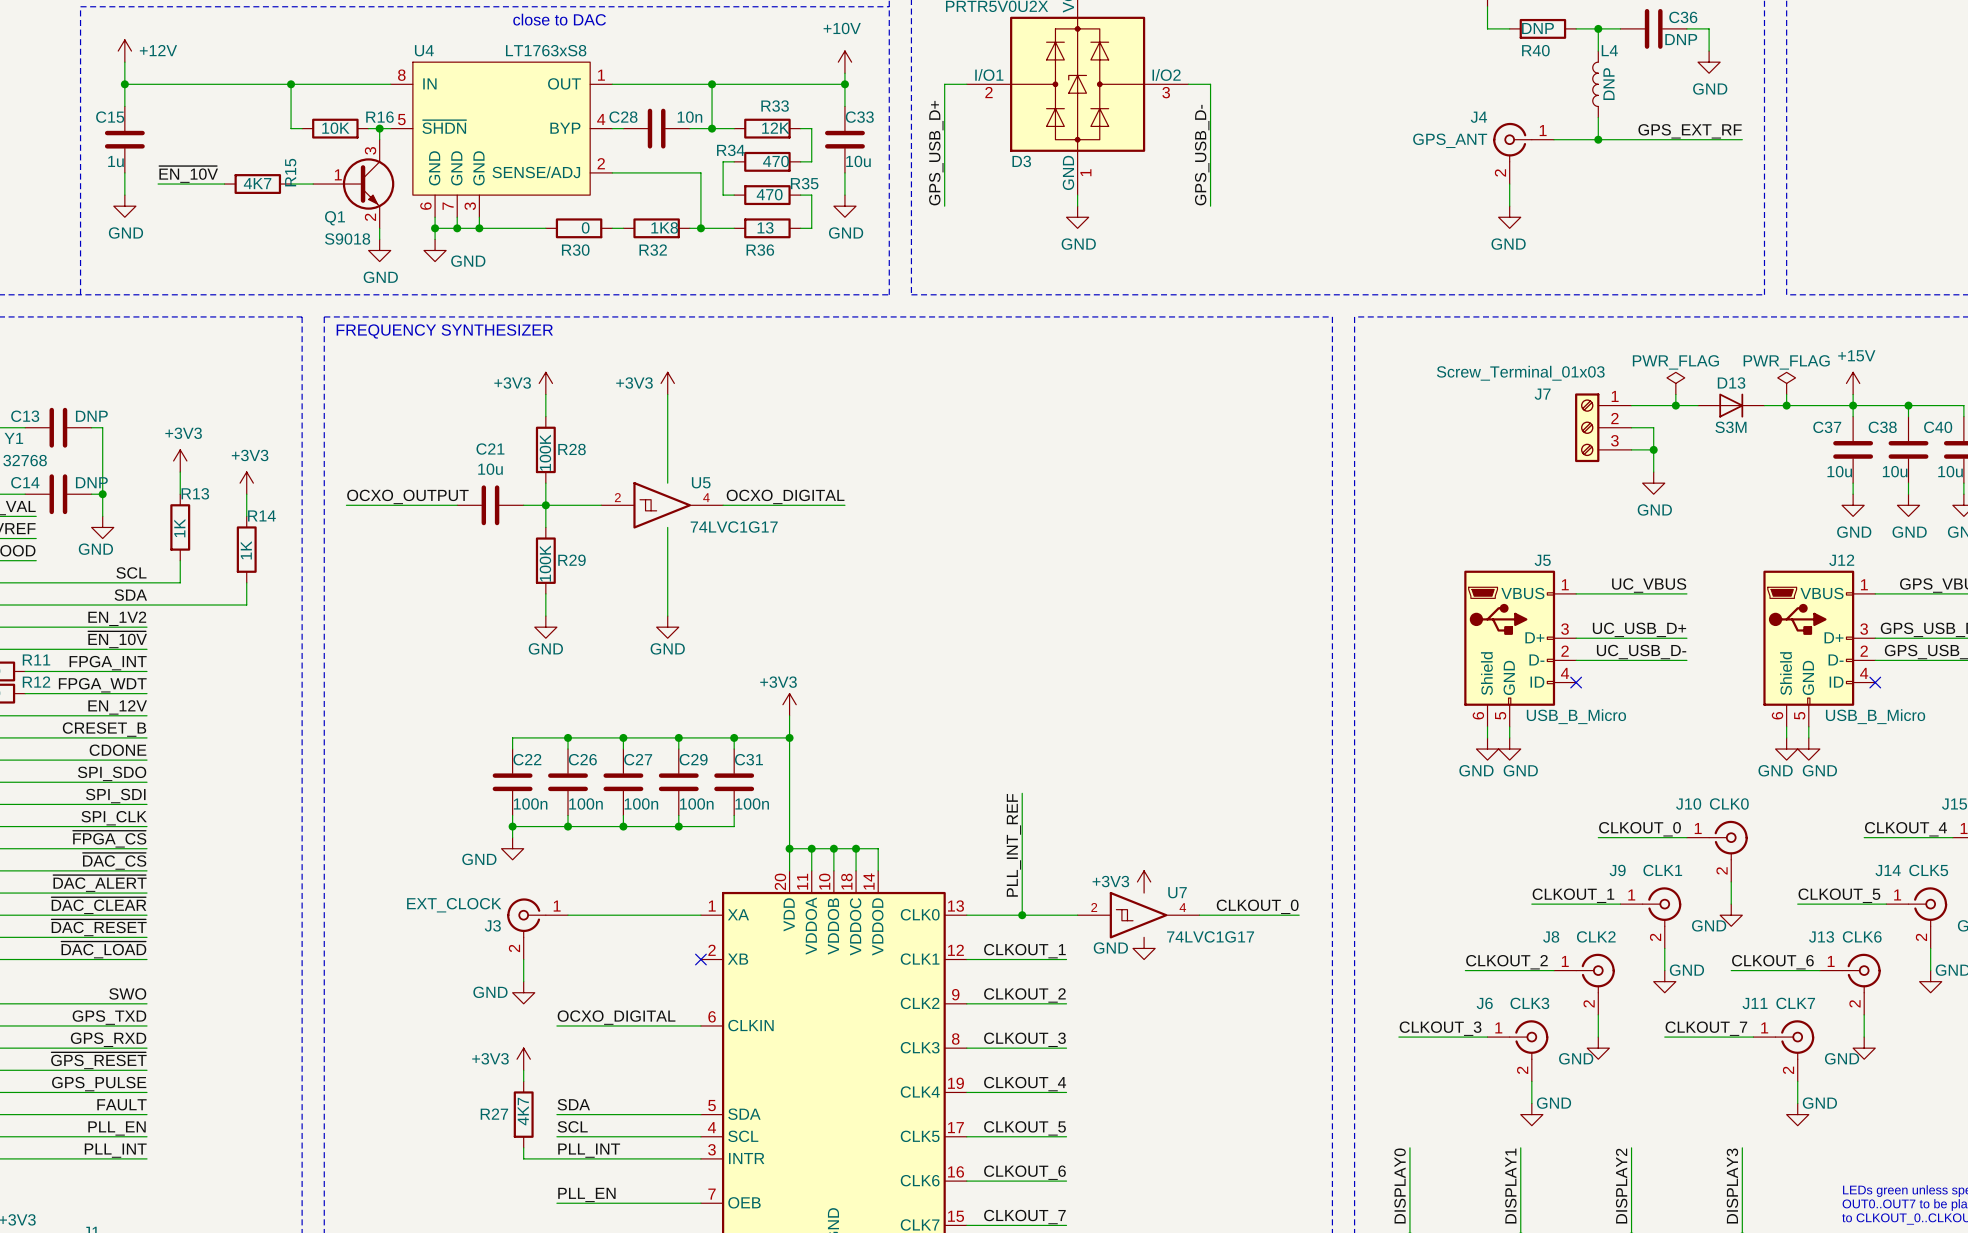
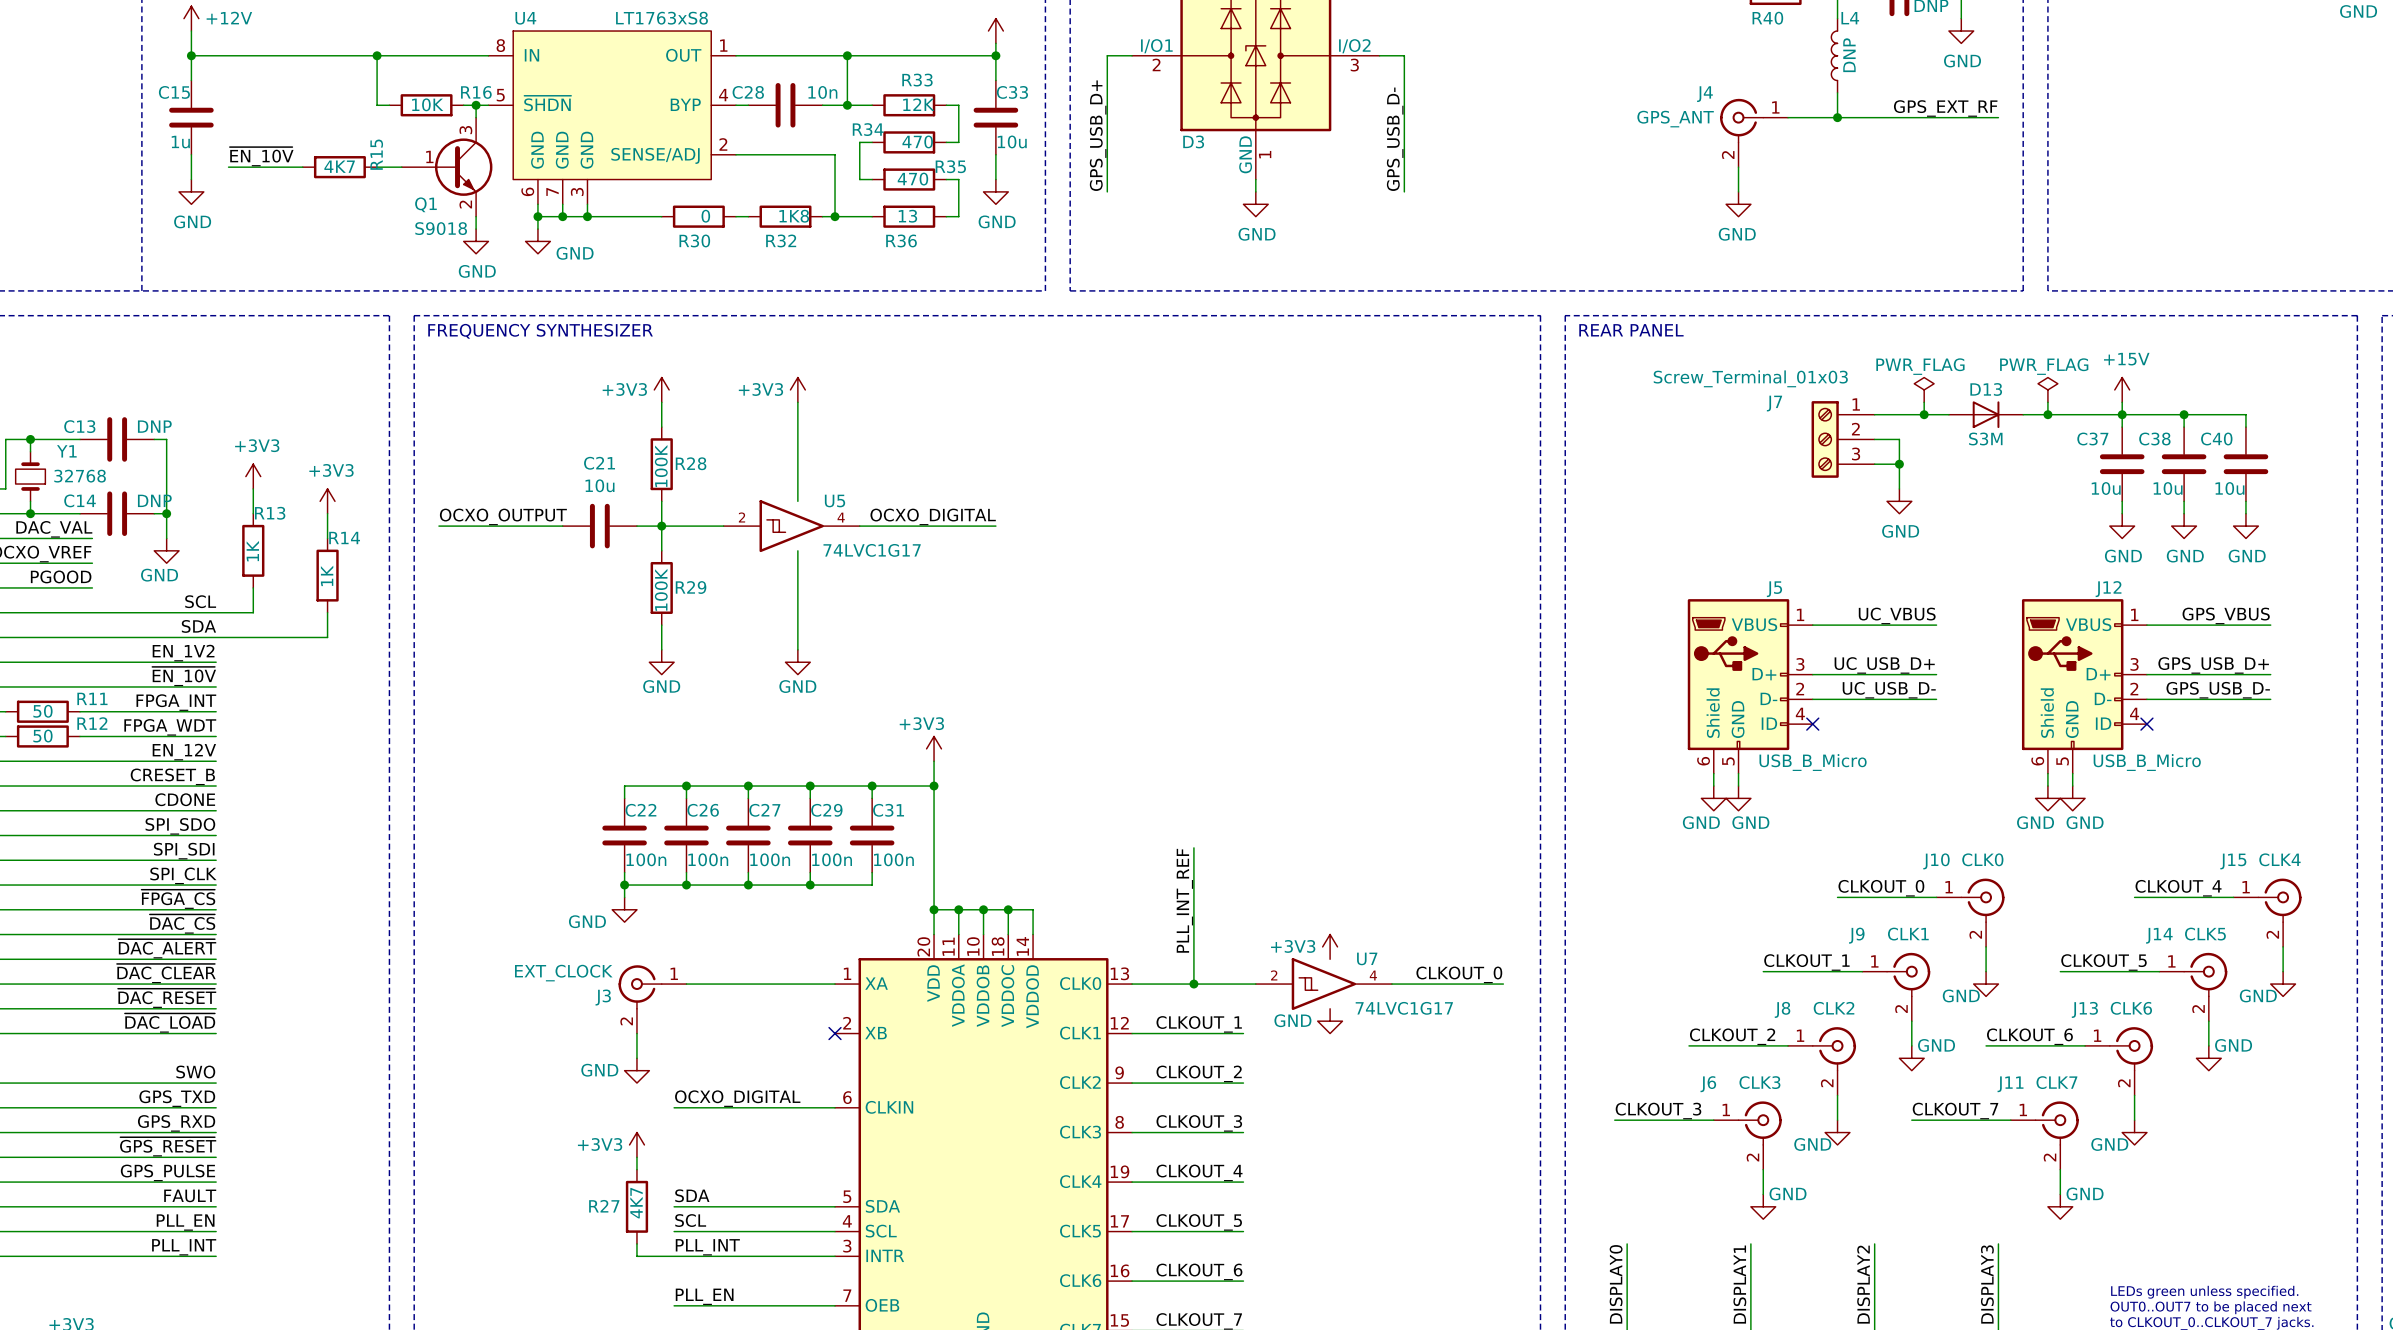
text: none -> REAR PANEL (1631, 330)

